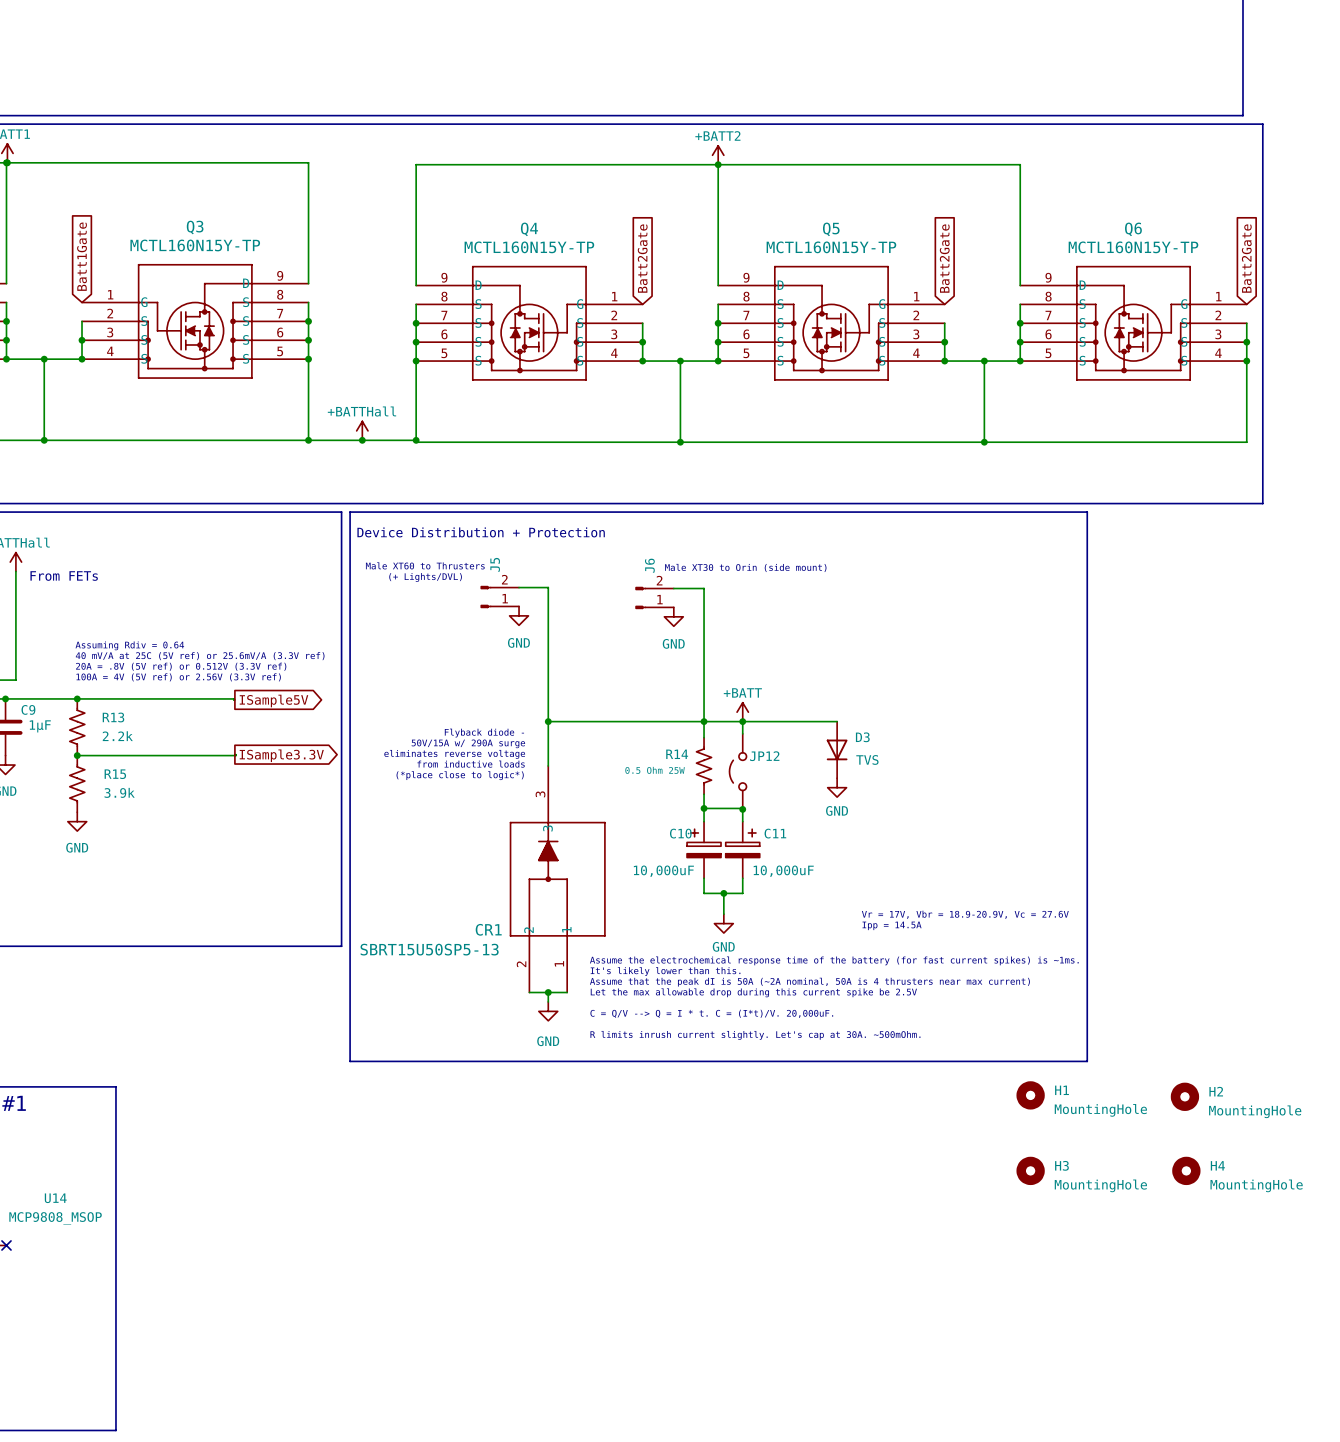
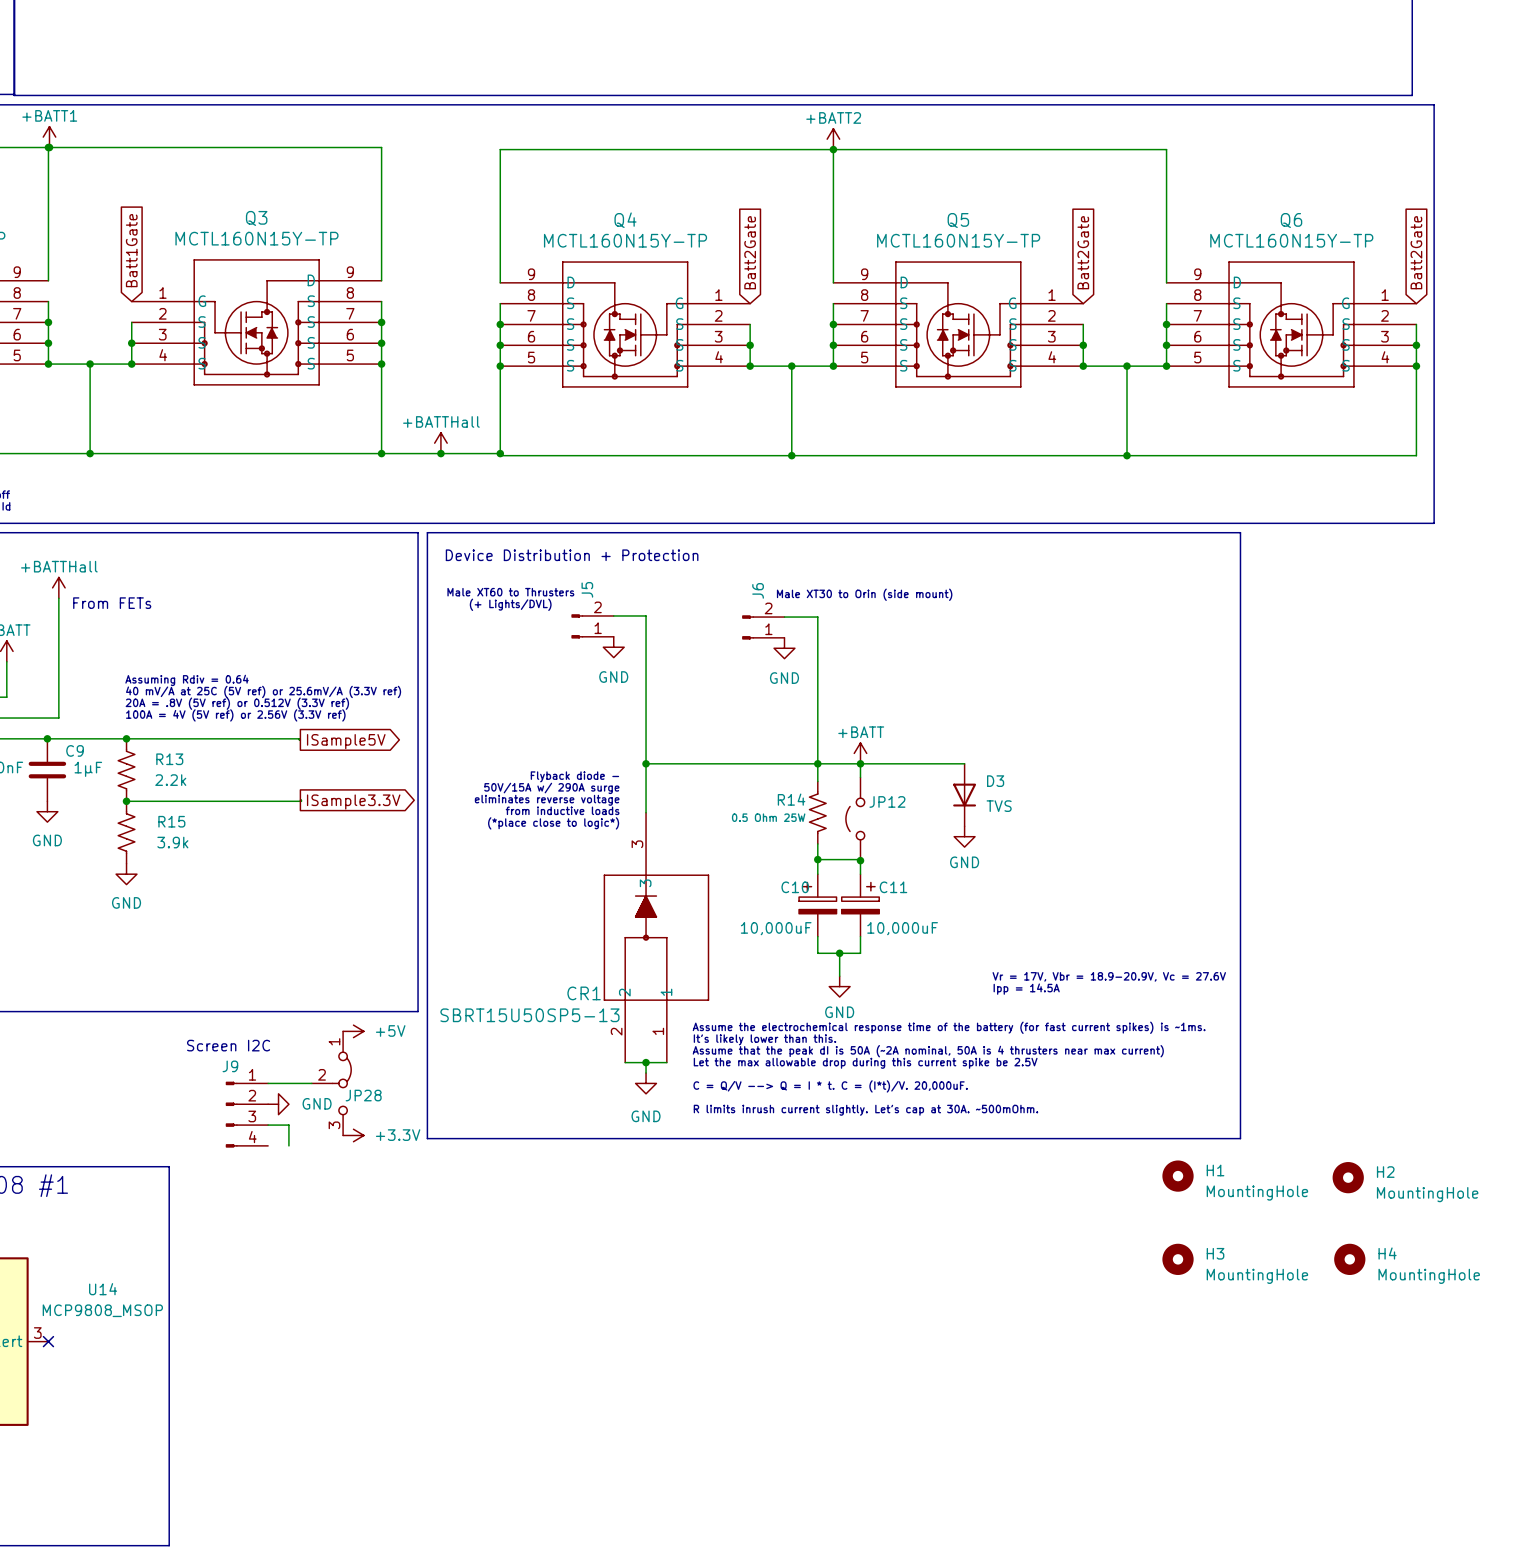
power symbol: none -> +5V (353, 1031)
text: none -> Screen I2C (228, 1045)
wire: none -> (268, 1083) (311, 1083)
JP28: none -> (331, 1083)
power symbol: none -> GND (278, 1104)
J9: none -> (246, 1114)
wire: none -> (268, 1125) (288, 1125) (288, 1145)
power symbol: none -> +3.3V (353, 1135)

